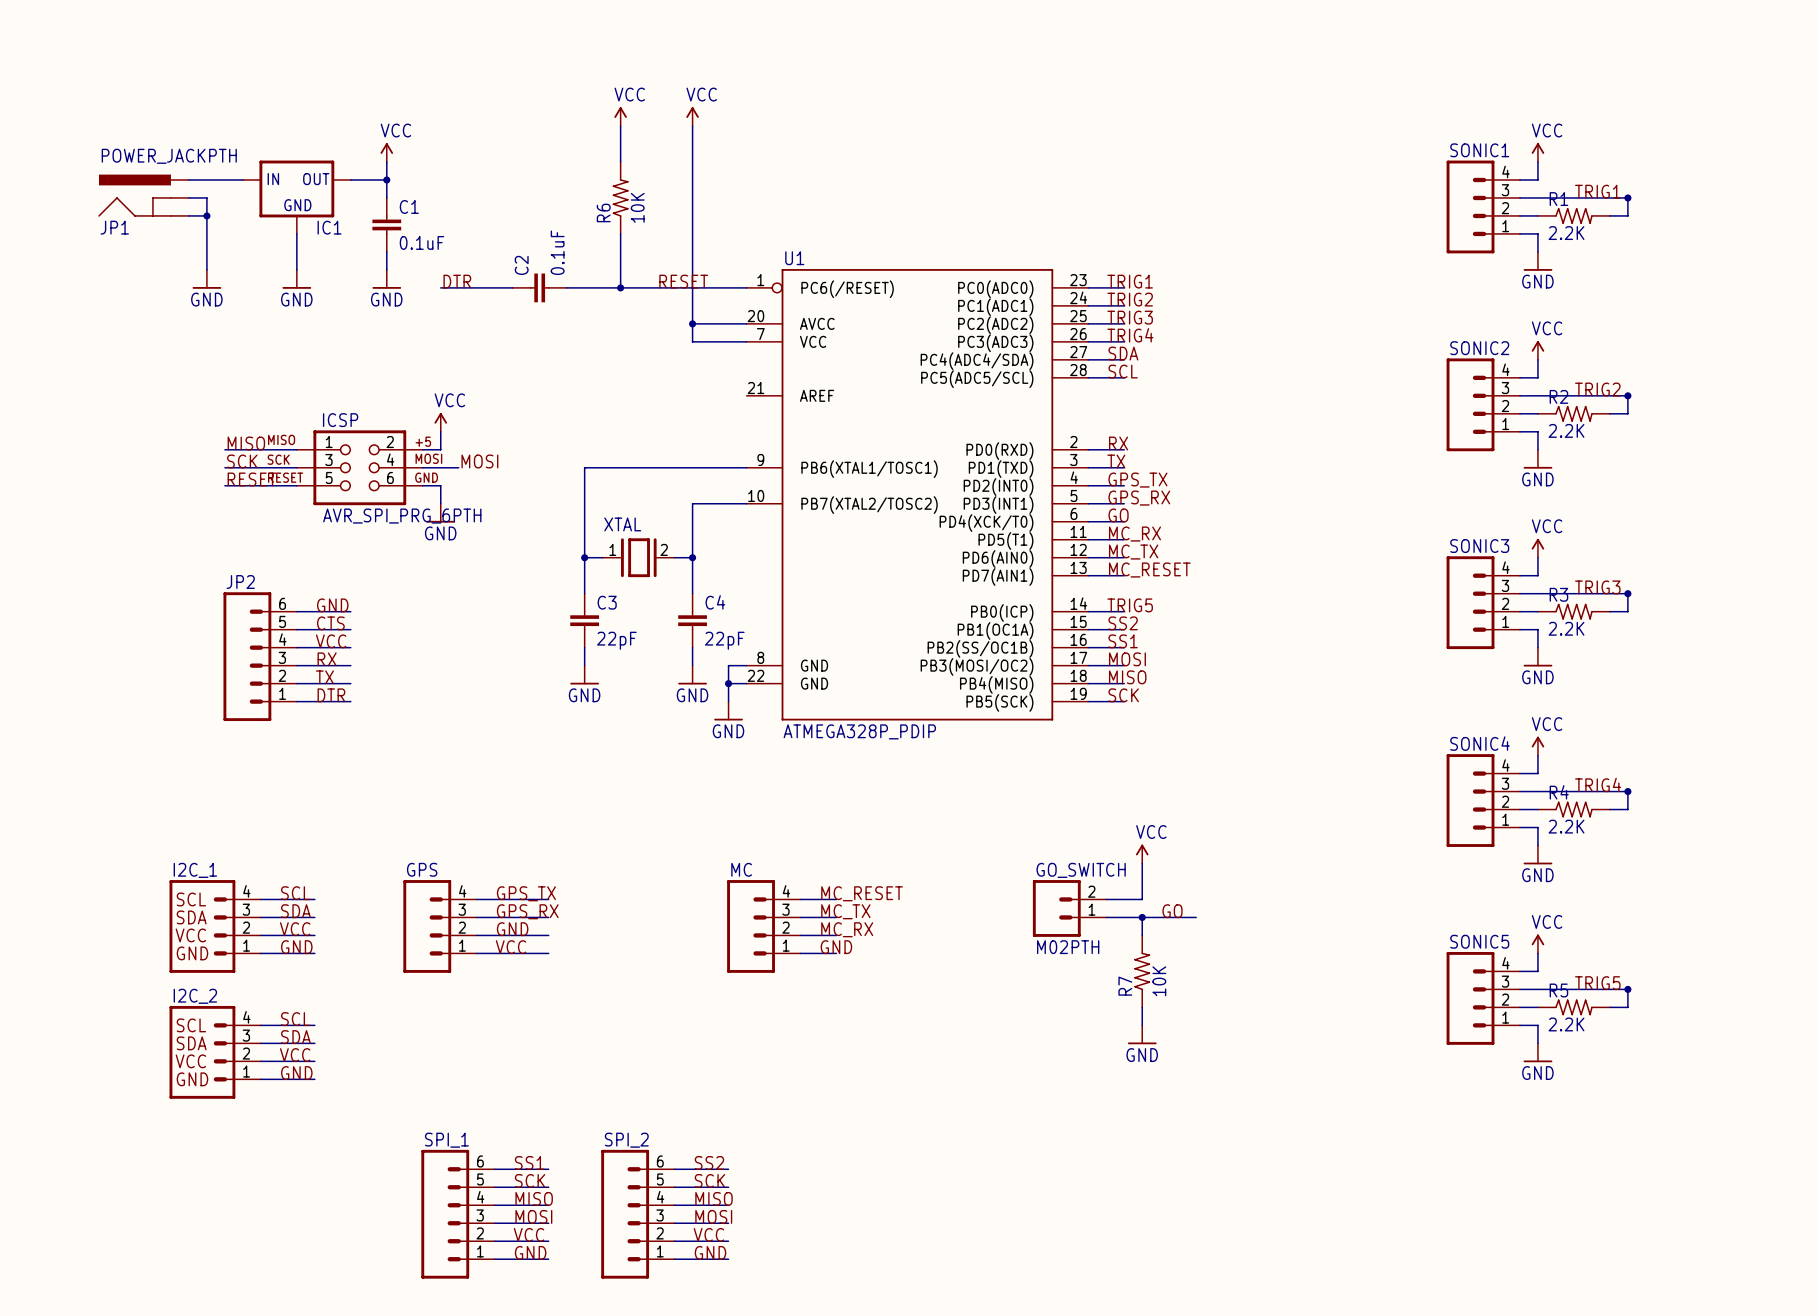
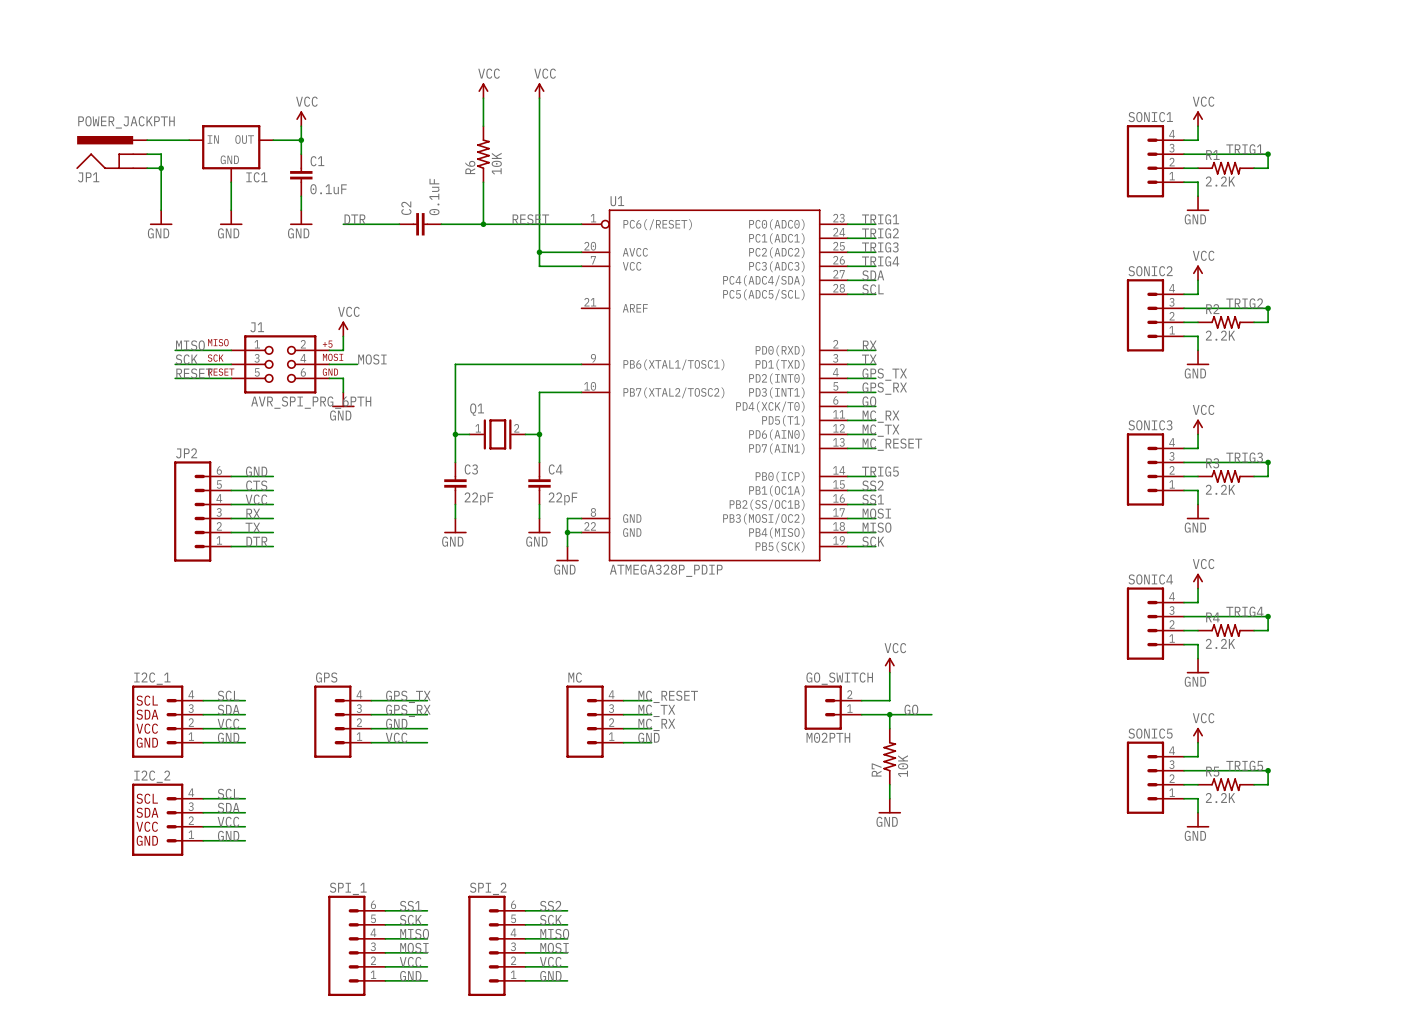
ICSP name: ICSP (340, 420) -> J1 (257, 327)
XTAL name: XTAL (622, 524) -> Q1 (477, 409)

